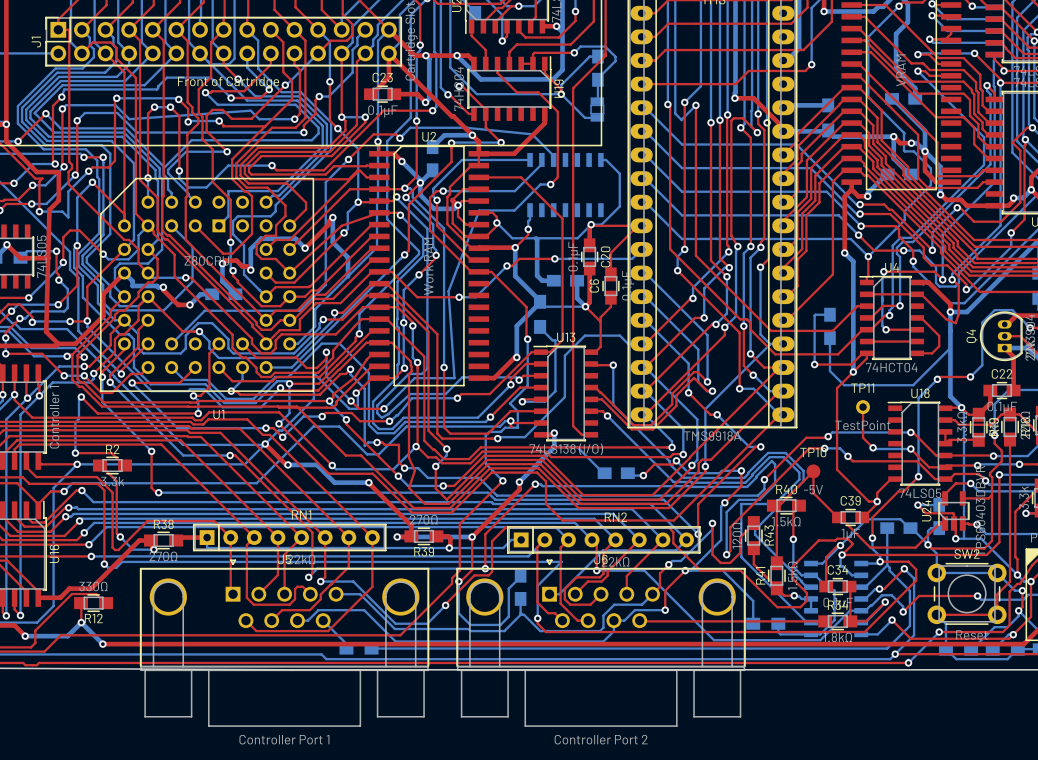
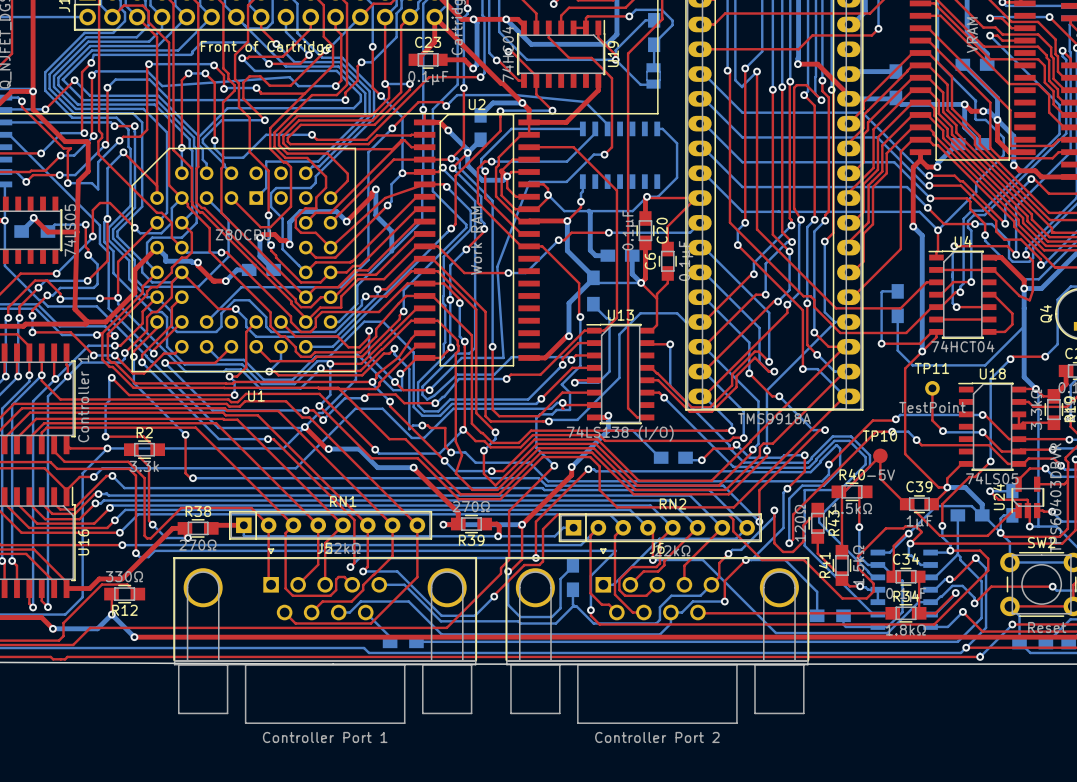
bottom track: none -> (947, 487) (965, 487) (982, 504) (982, 515)

